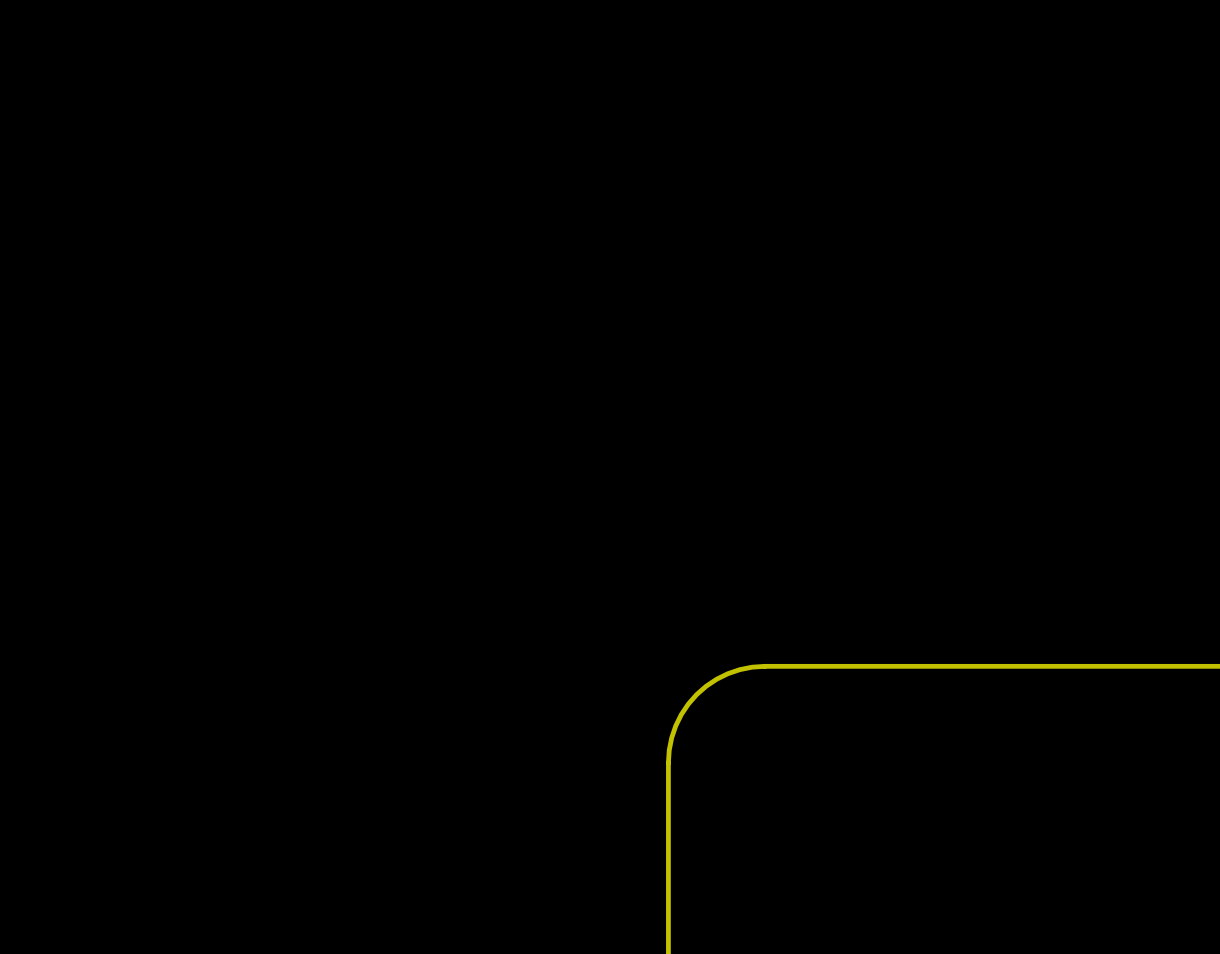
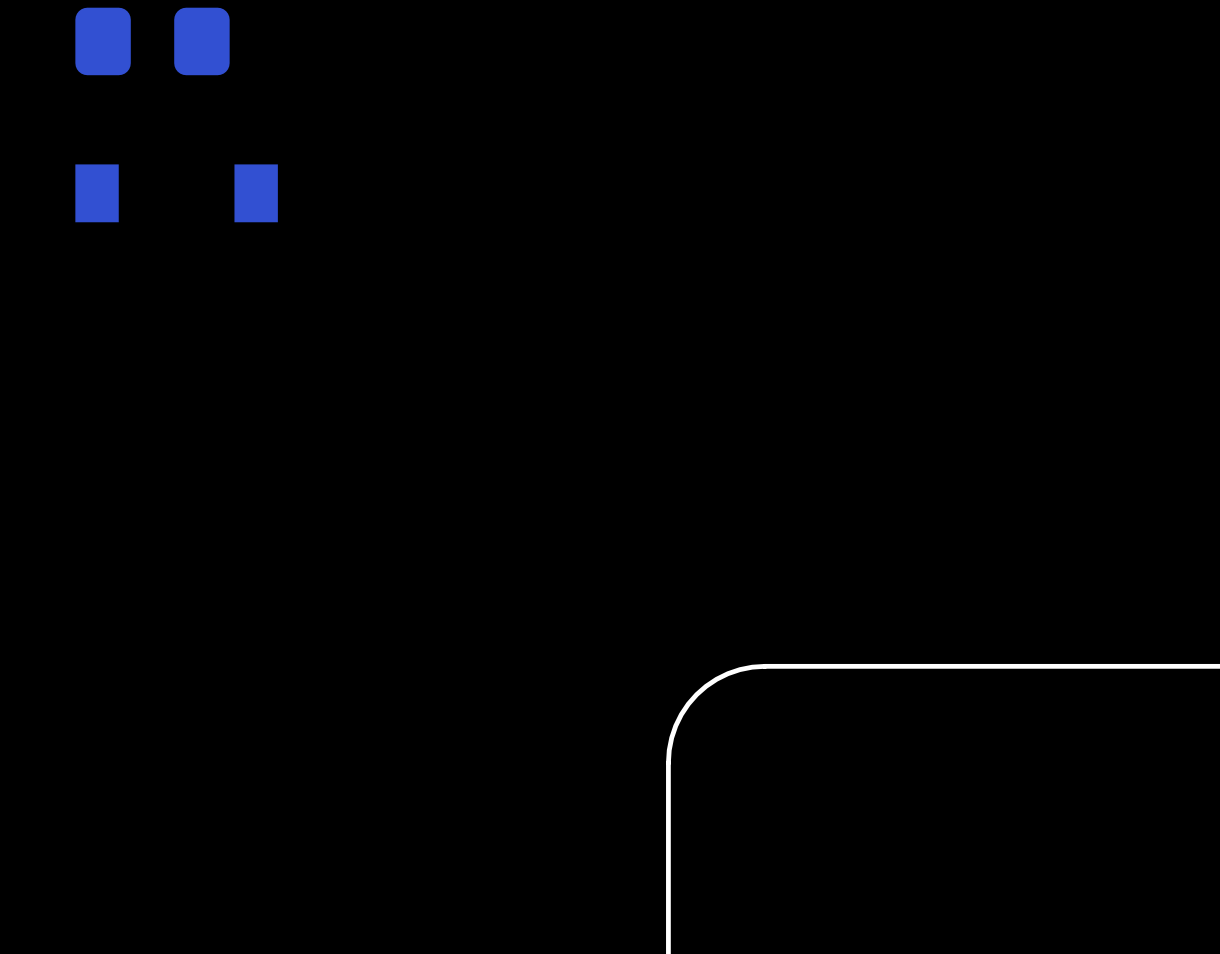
part: none -> (152, 41)
part: none -> (176, 193)

